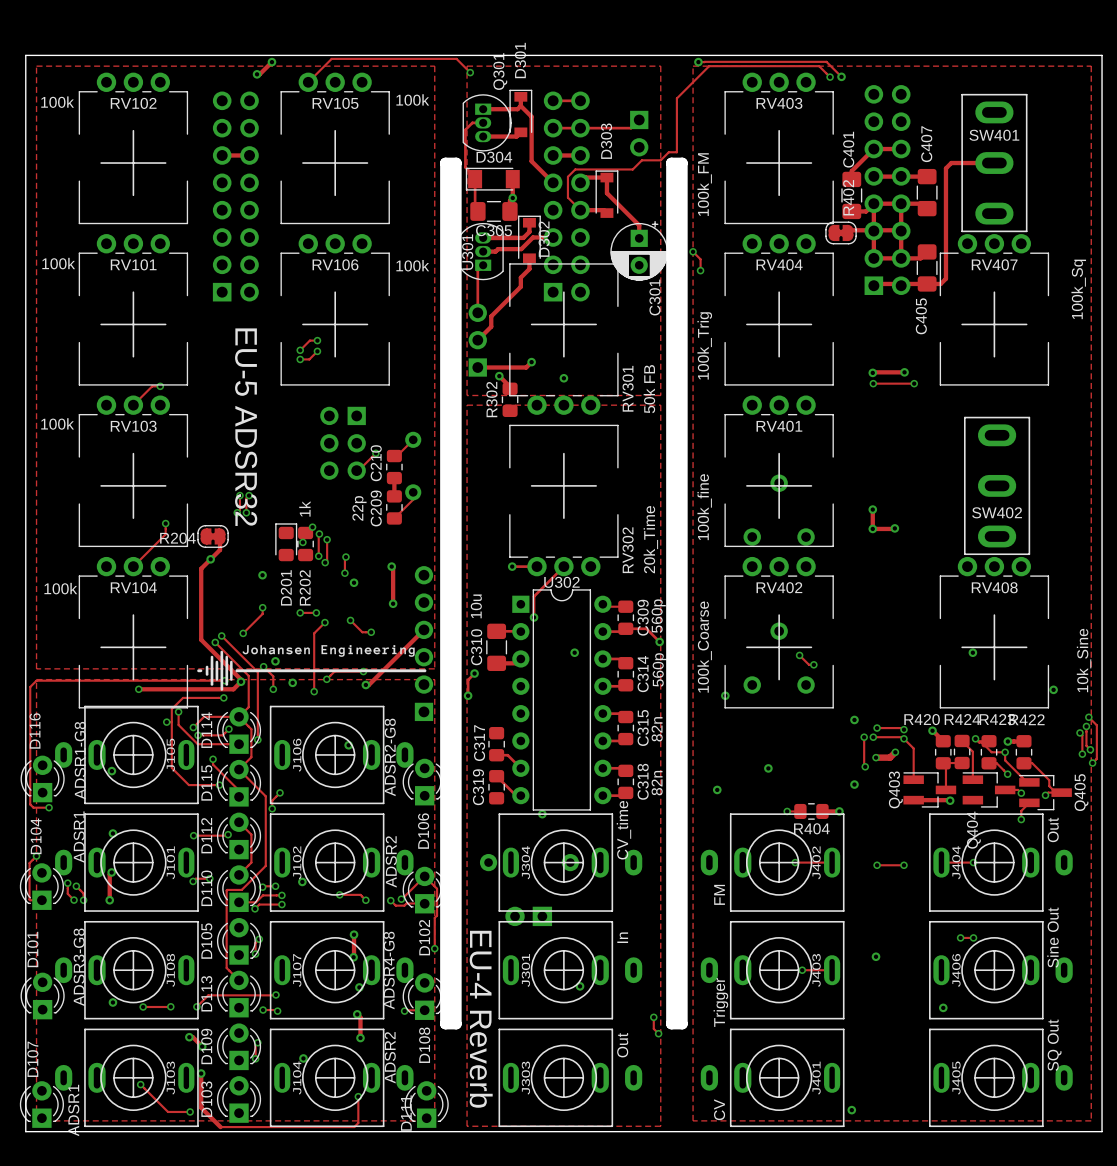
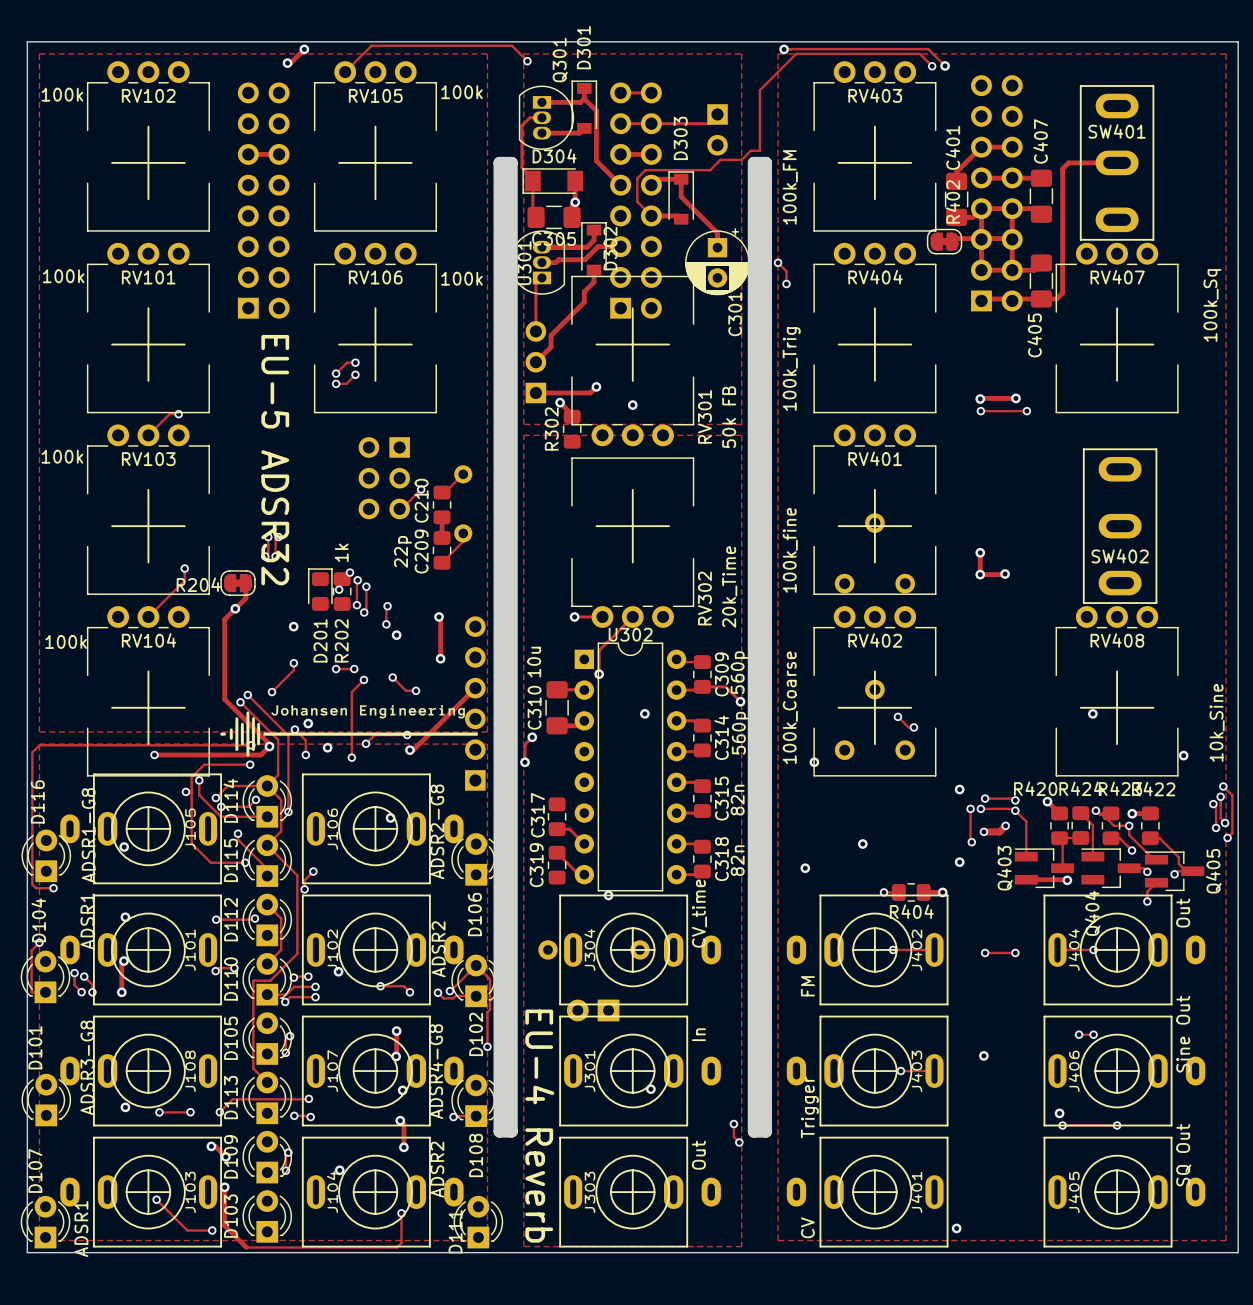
track: none -> (1062, 1125) (1117, 1125)
via: none -> (1062, 1125)
via: none -> (1117, 1125)

